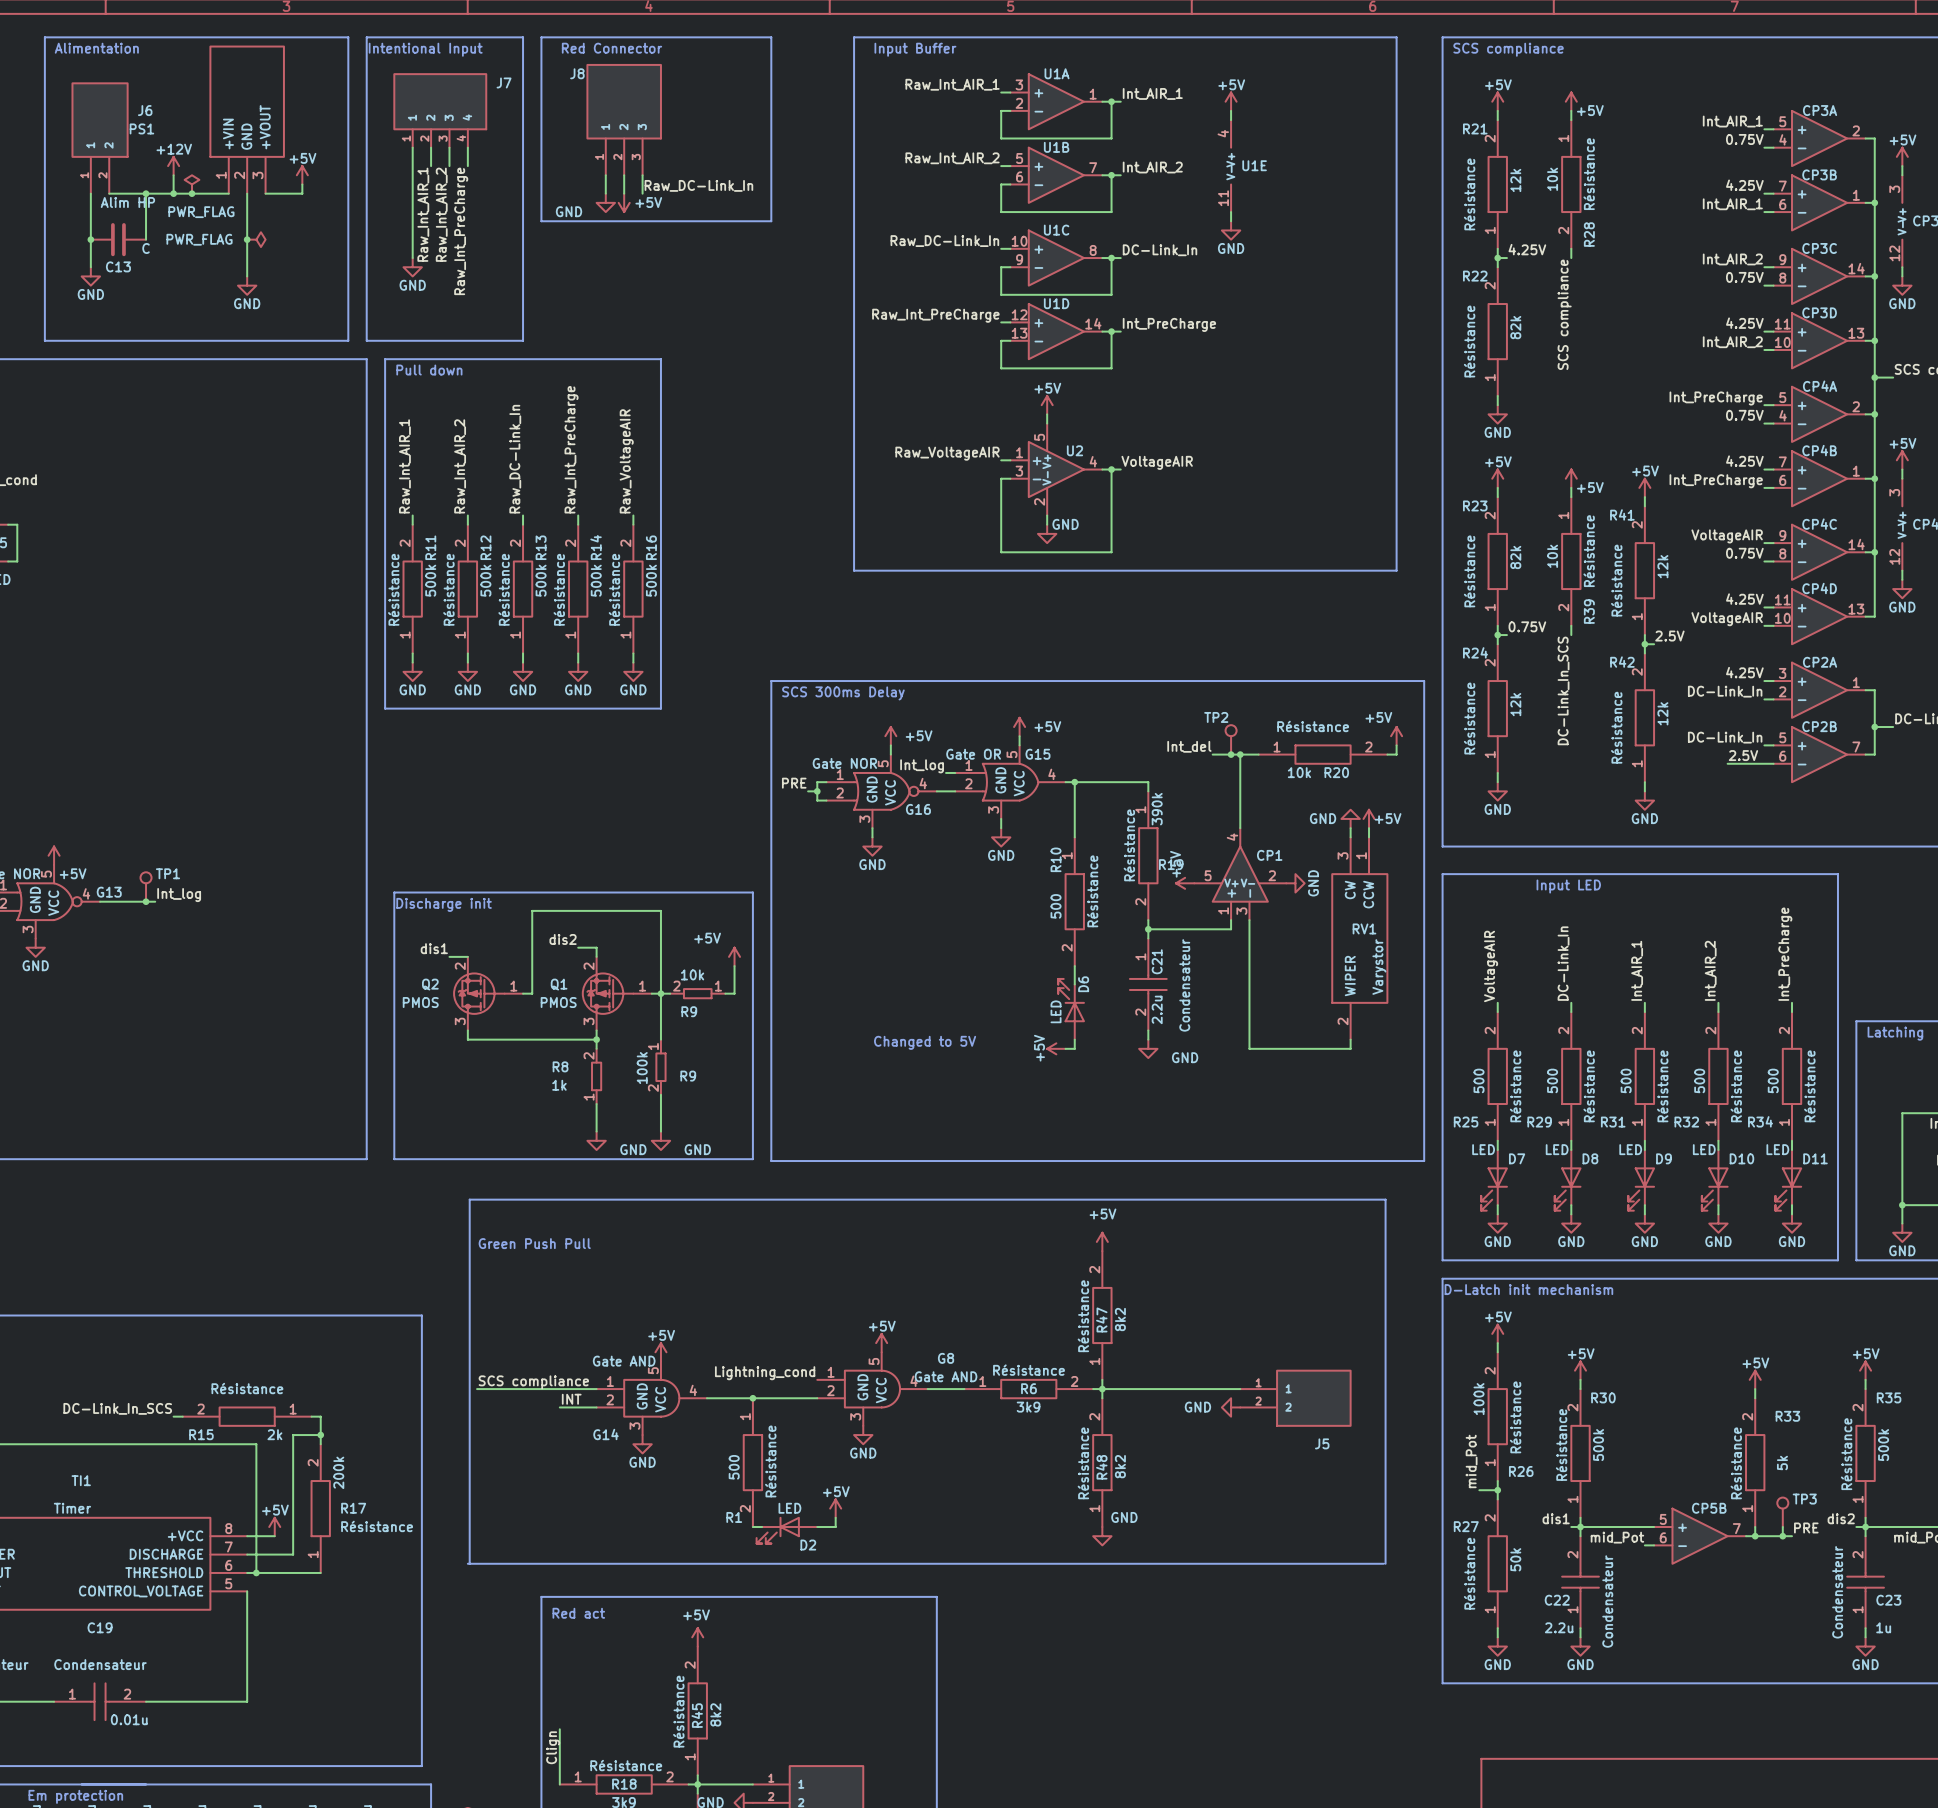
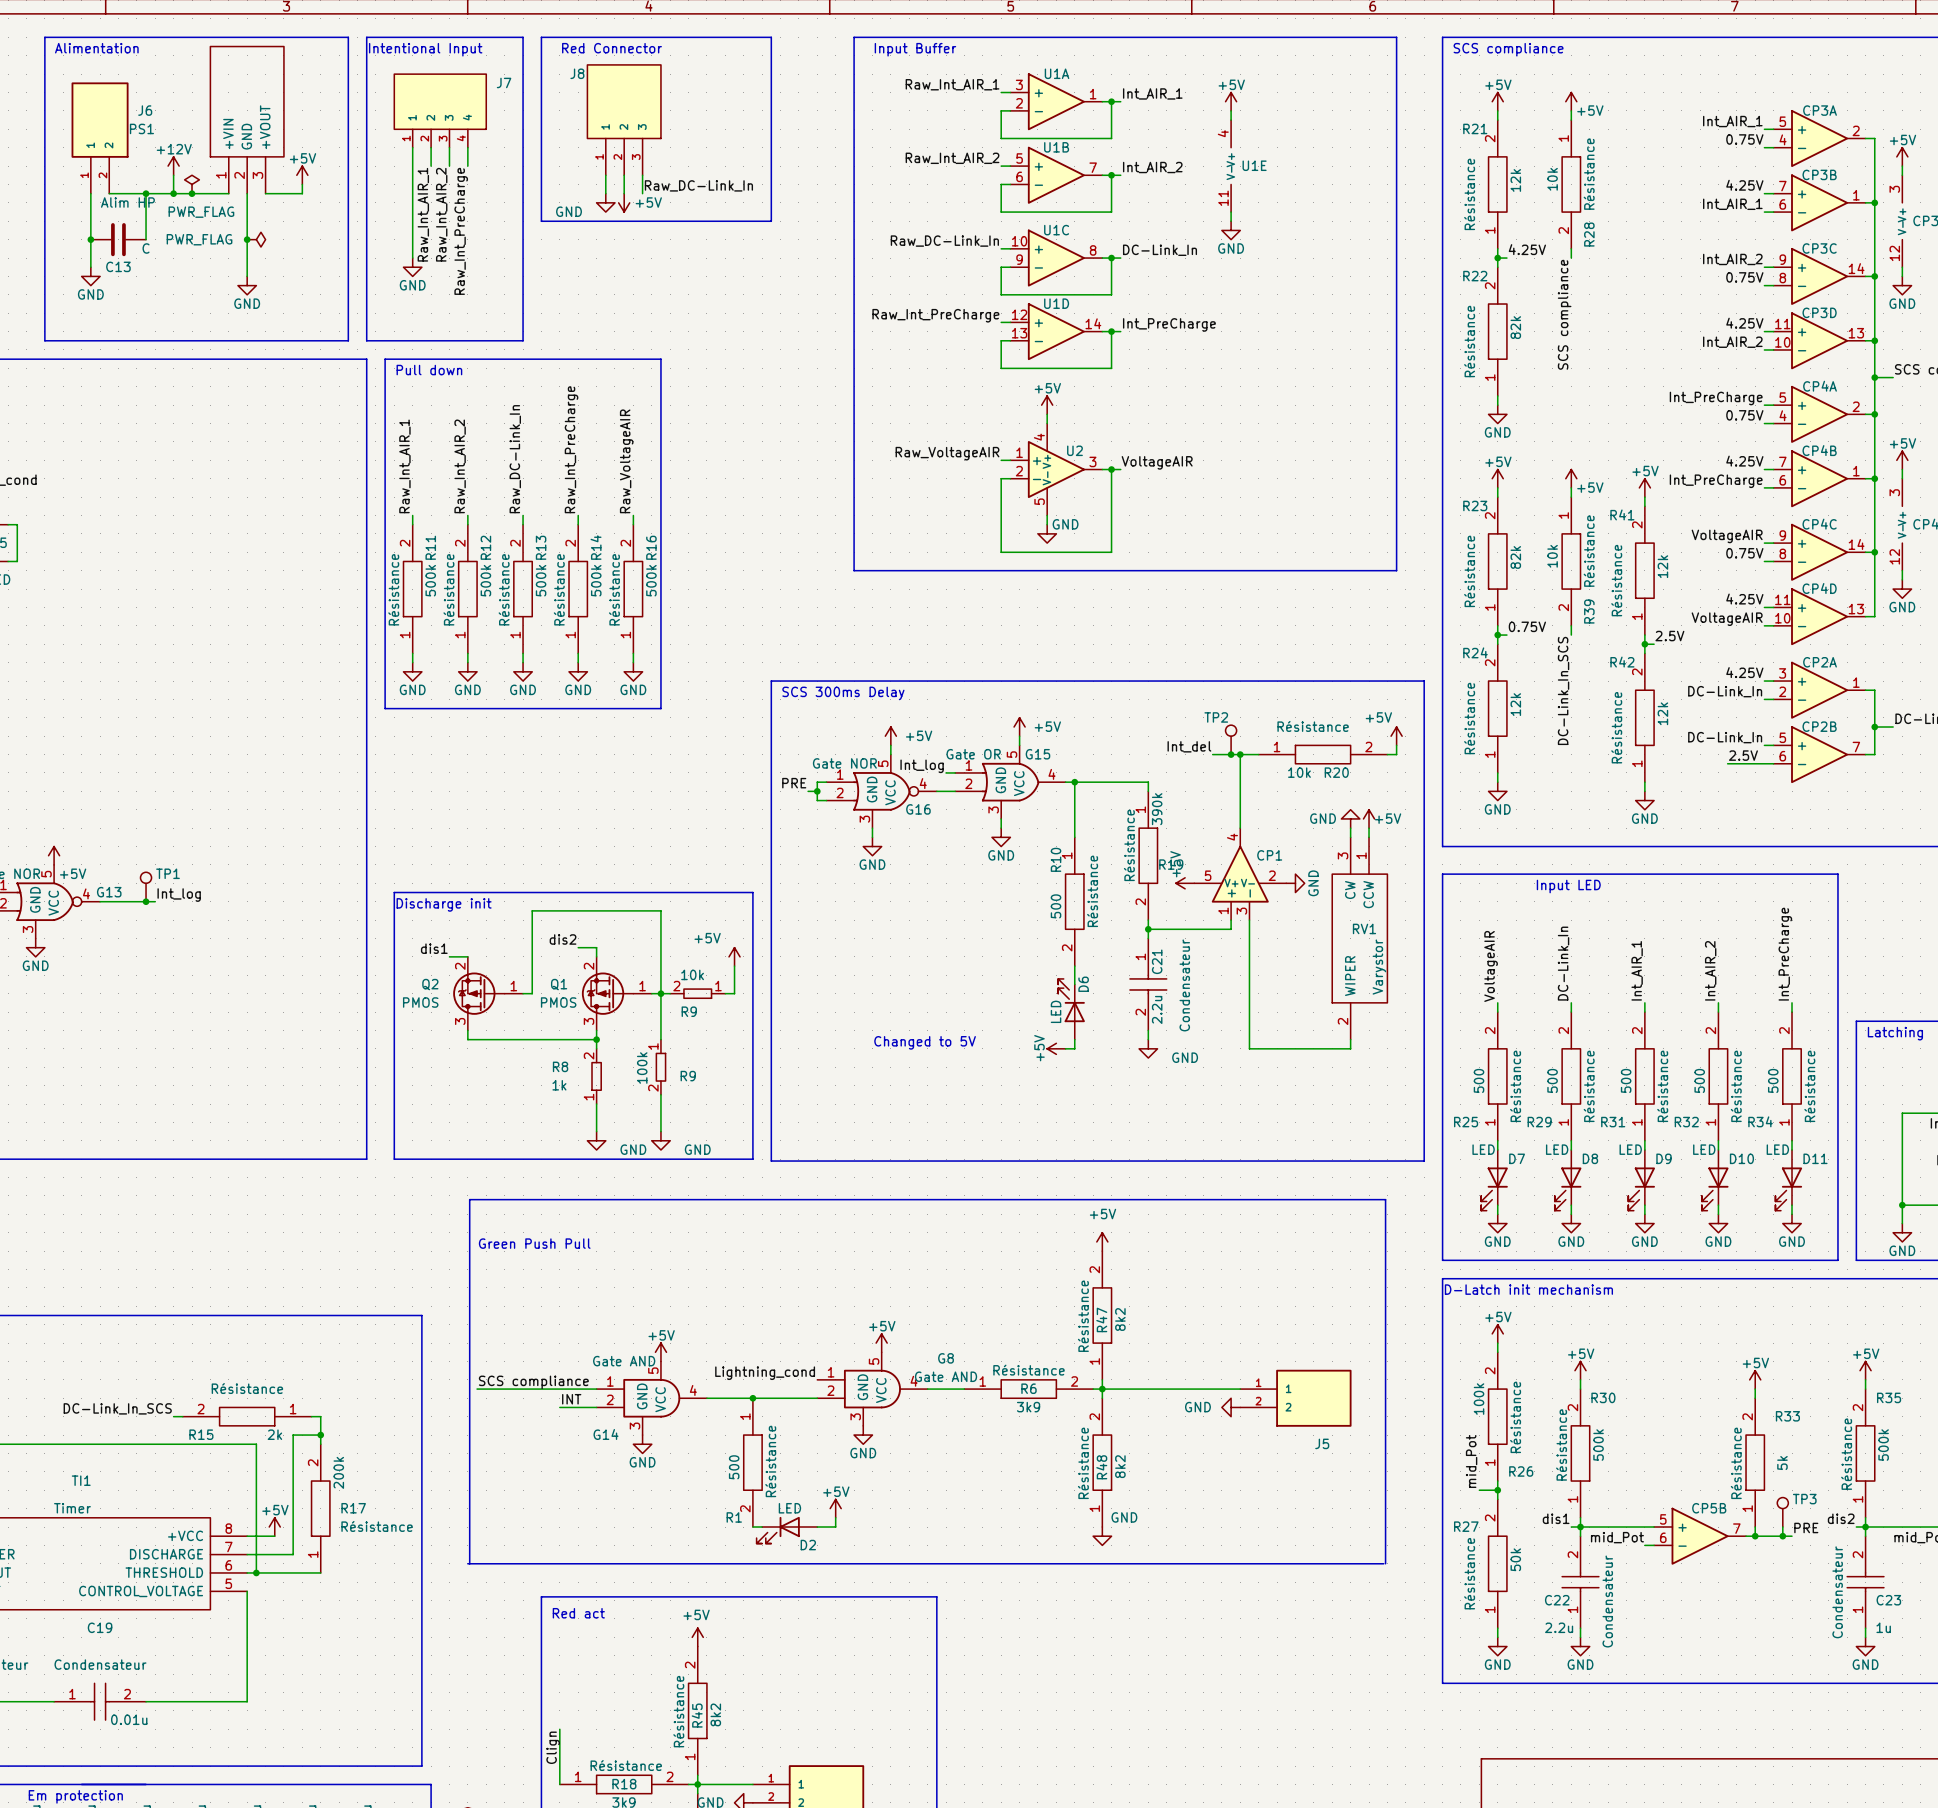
U2 pin number: 5 (1039, 437) -> 4 (1039, 437)
U2 pin number: 4 (1093, 461) -> 3 (1092, 461)
U2 pin number: 3 (1019, 471) -> 2 (1019, 471)
U2 pin number: 2 (1039, 501) -> 5 (1039, 501)

